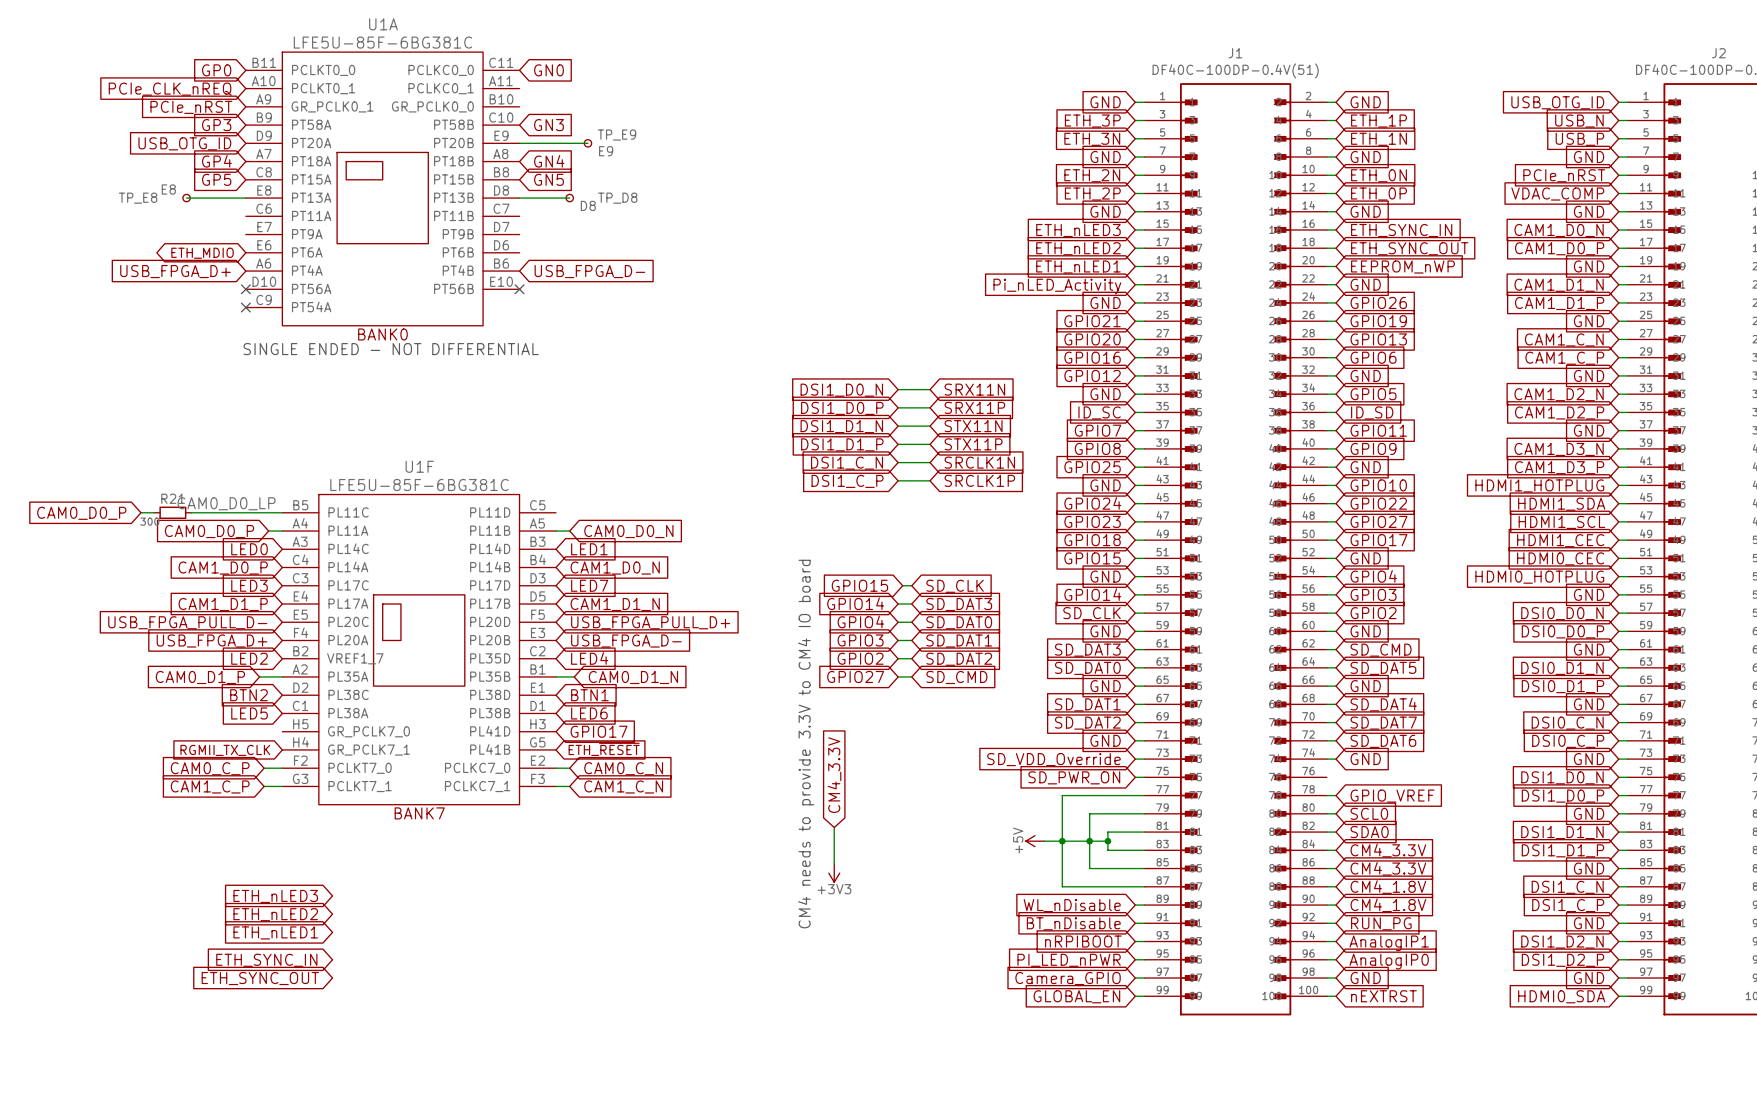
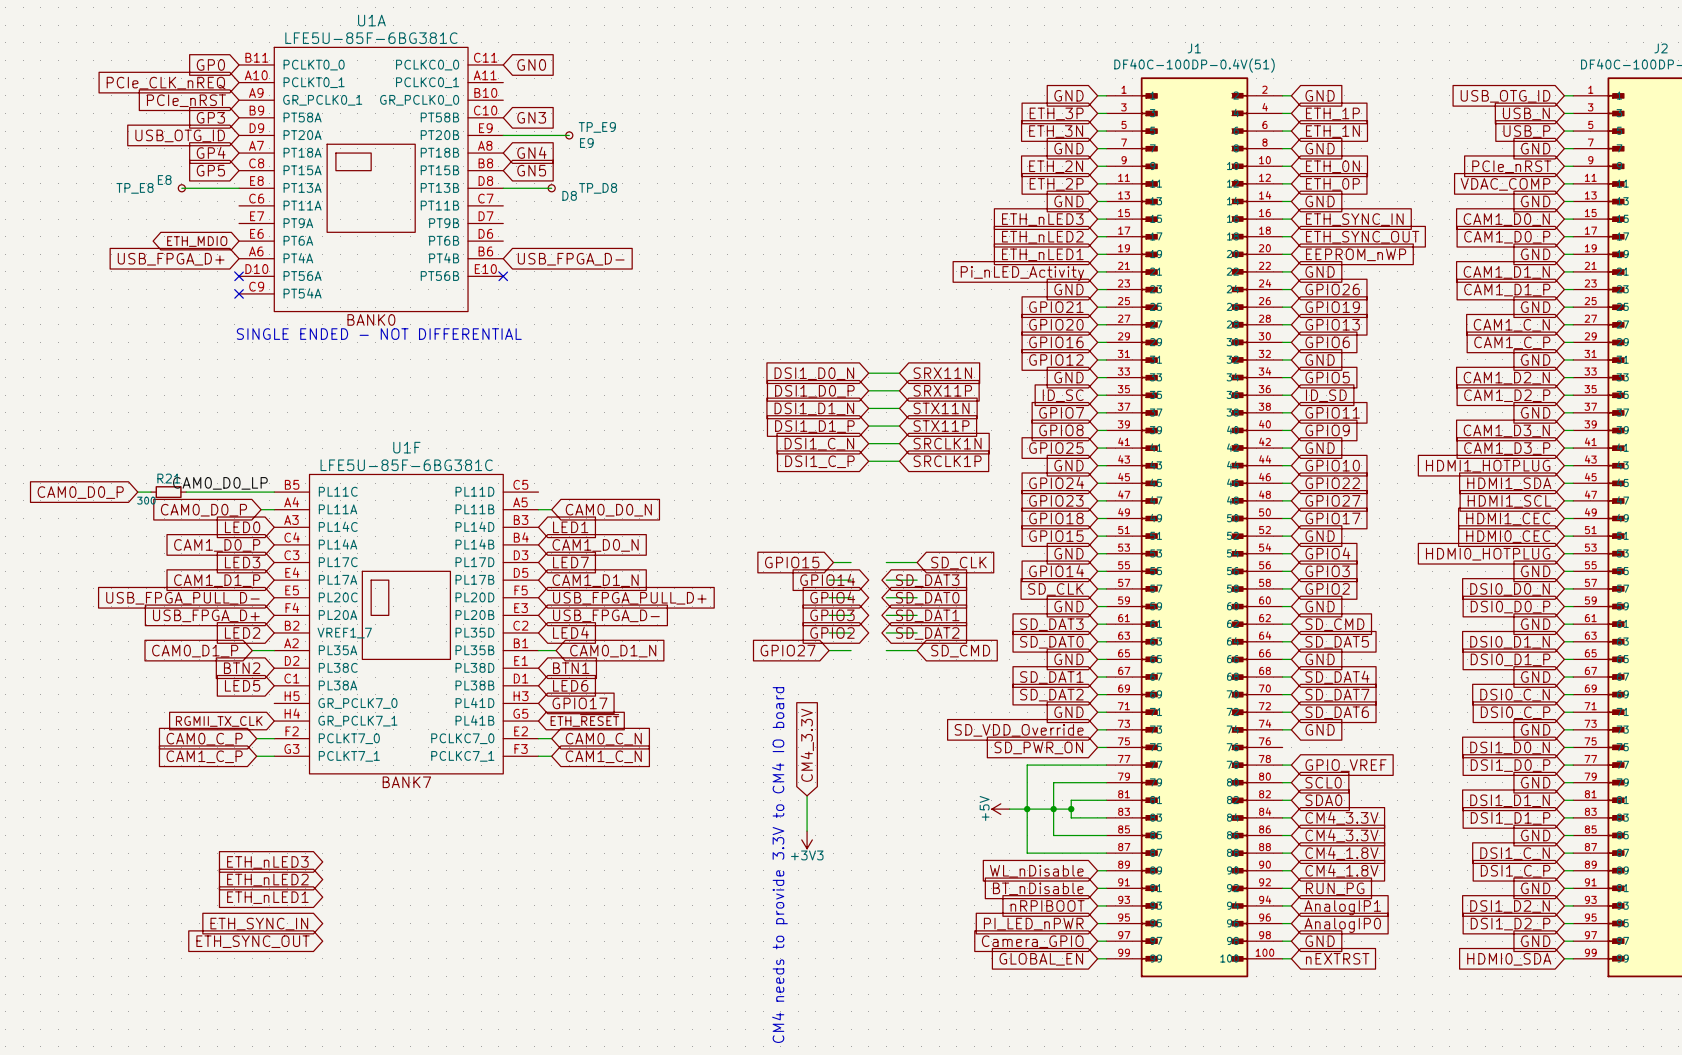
global label position: GPIO15 (859, 585) -> GPIO15 (792, 562)
wire: none -> (833, 562) (851, 562)
wire: (902, 585) (911, 585) -> none
wire: none -> (886, 562) (917, 562)
global label position: SD_CLK (955, 586) -> SD_CLK (958, 563)
wire: none -> (829, 580) (851, 580)
wire: (898, 604) (911, 604) -> none
wire: none -> (886, 580) (917, 580)
wire: none -> (829, 597) (851, 597)
wire: (898, 622) (911, 622) -> none
wire: none -> (886, 597) (917, 597)
wire: none -> (829, 615) (851, 615)
wire: (898, 640) (911, 640) -> none
wire: none -> (886, 615) (917, 615)
wire: none -> (829, 632) (851, 632)
wire: (898, 658) (911, 658) -> none
wire: none -> (886, 632) (917, 632)
global label position: GPIO27 (855, 676) -> GPIO27 (788, 650)
wire: none -> (829, 650) (851, 650)
wire: (898, 676) (911, 676) -> none
wire: none -> (886, 650) (917, 650)
global label position: SD_CMD (956, 677) -> SD_CMD (960, 651)
text position: CM4 needs to provide 3.3V to CM4 IO board (806, 744) -> CM4 needs to provide 3.3V to CM4 IO board (779, 865)

